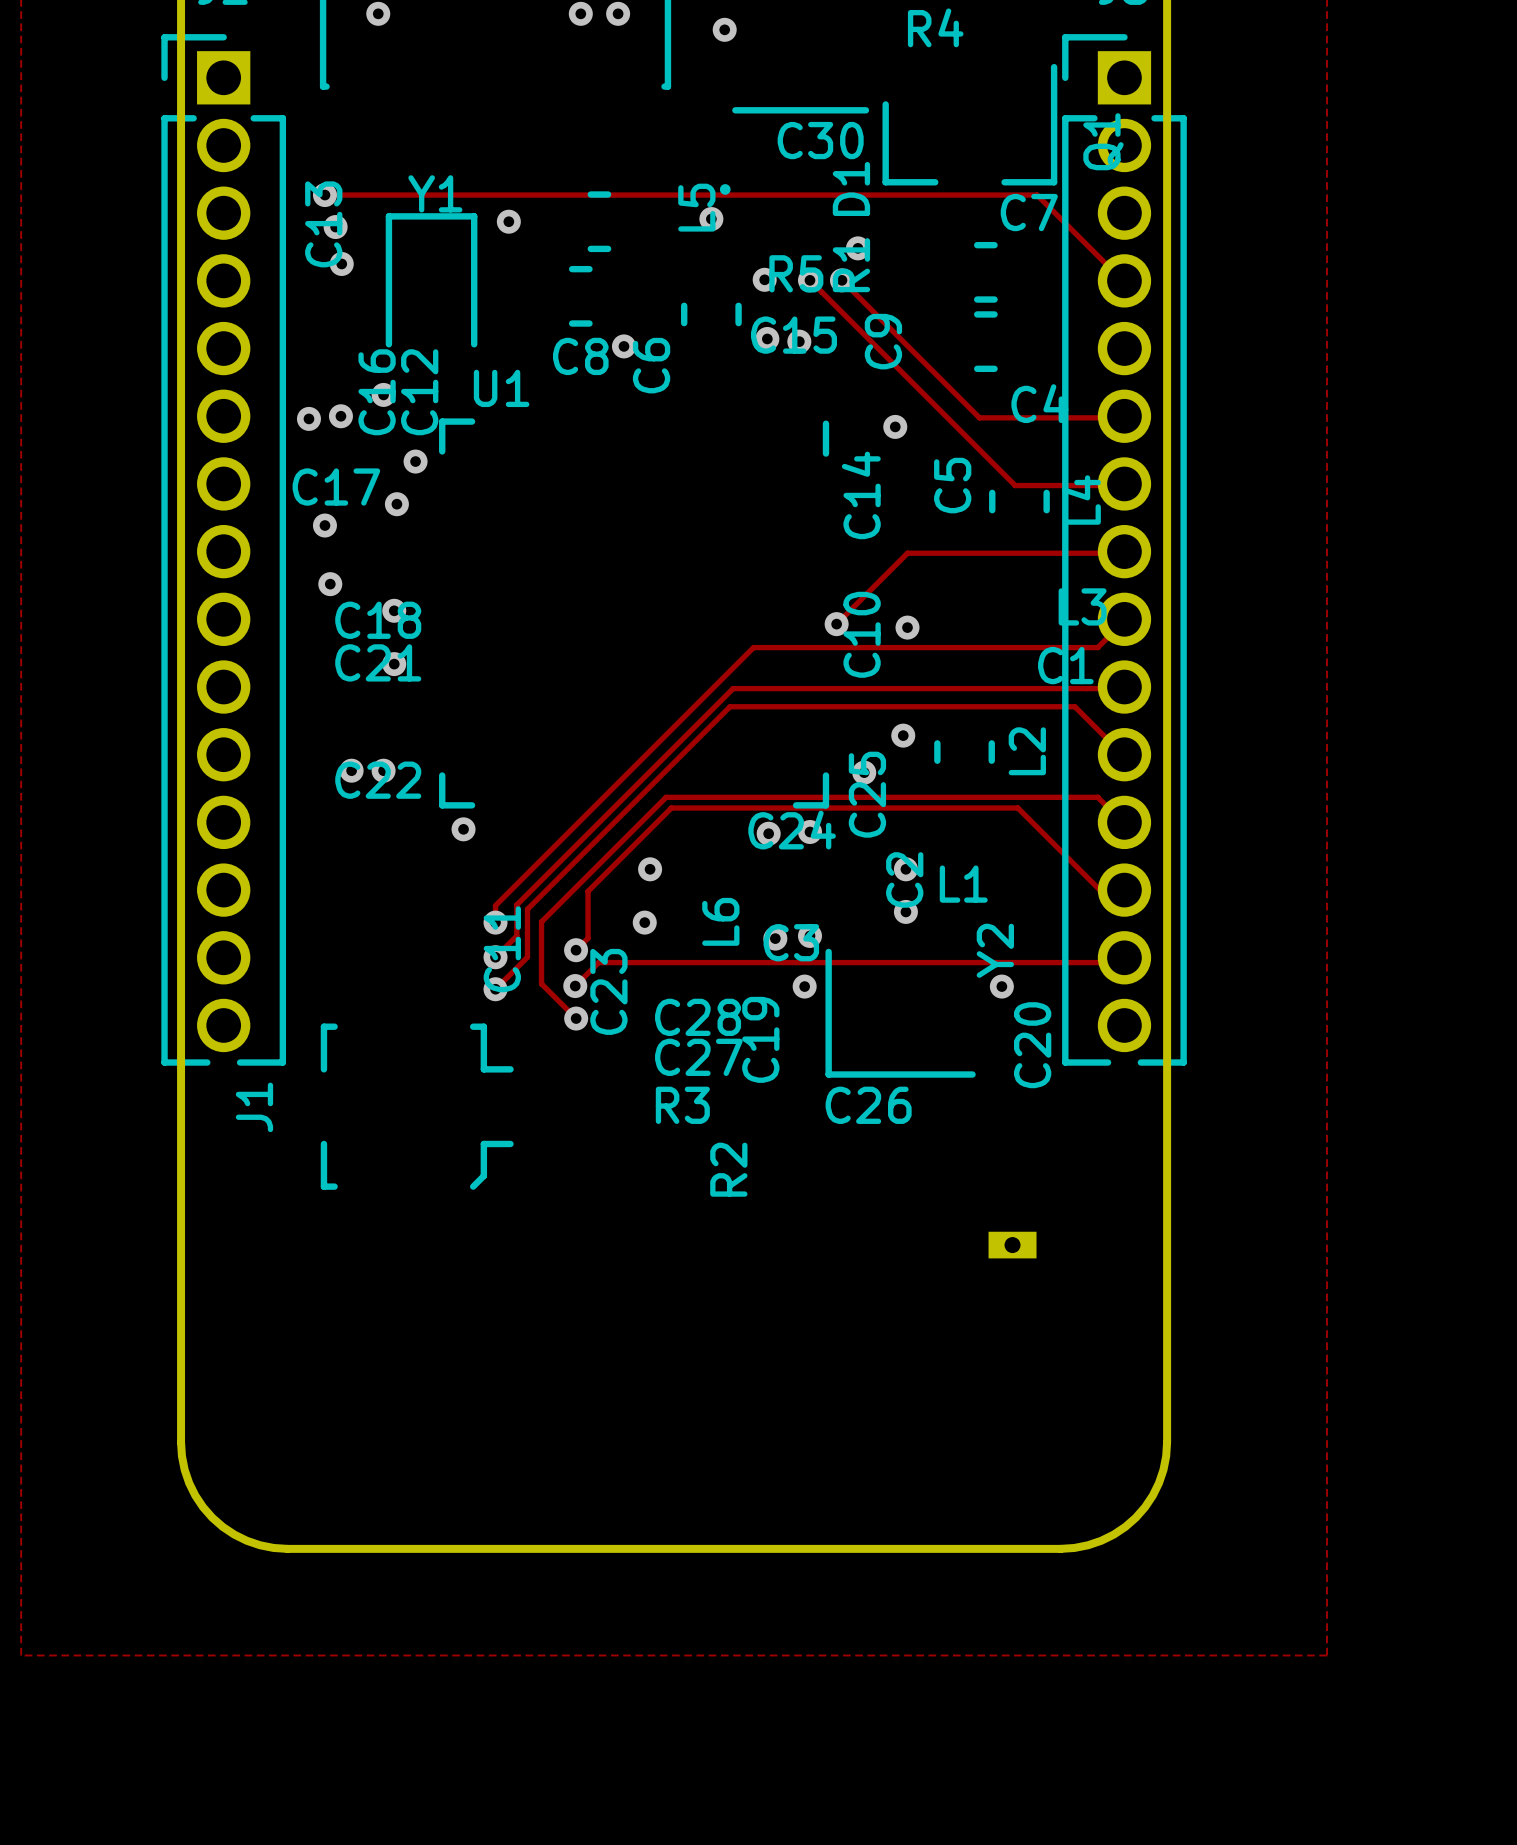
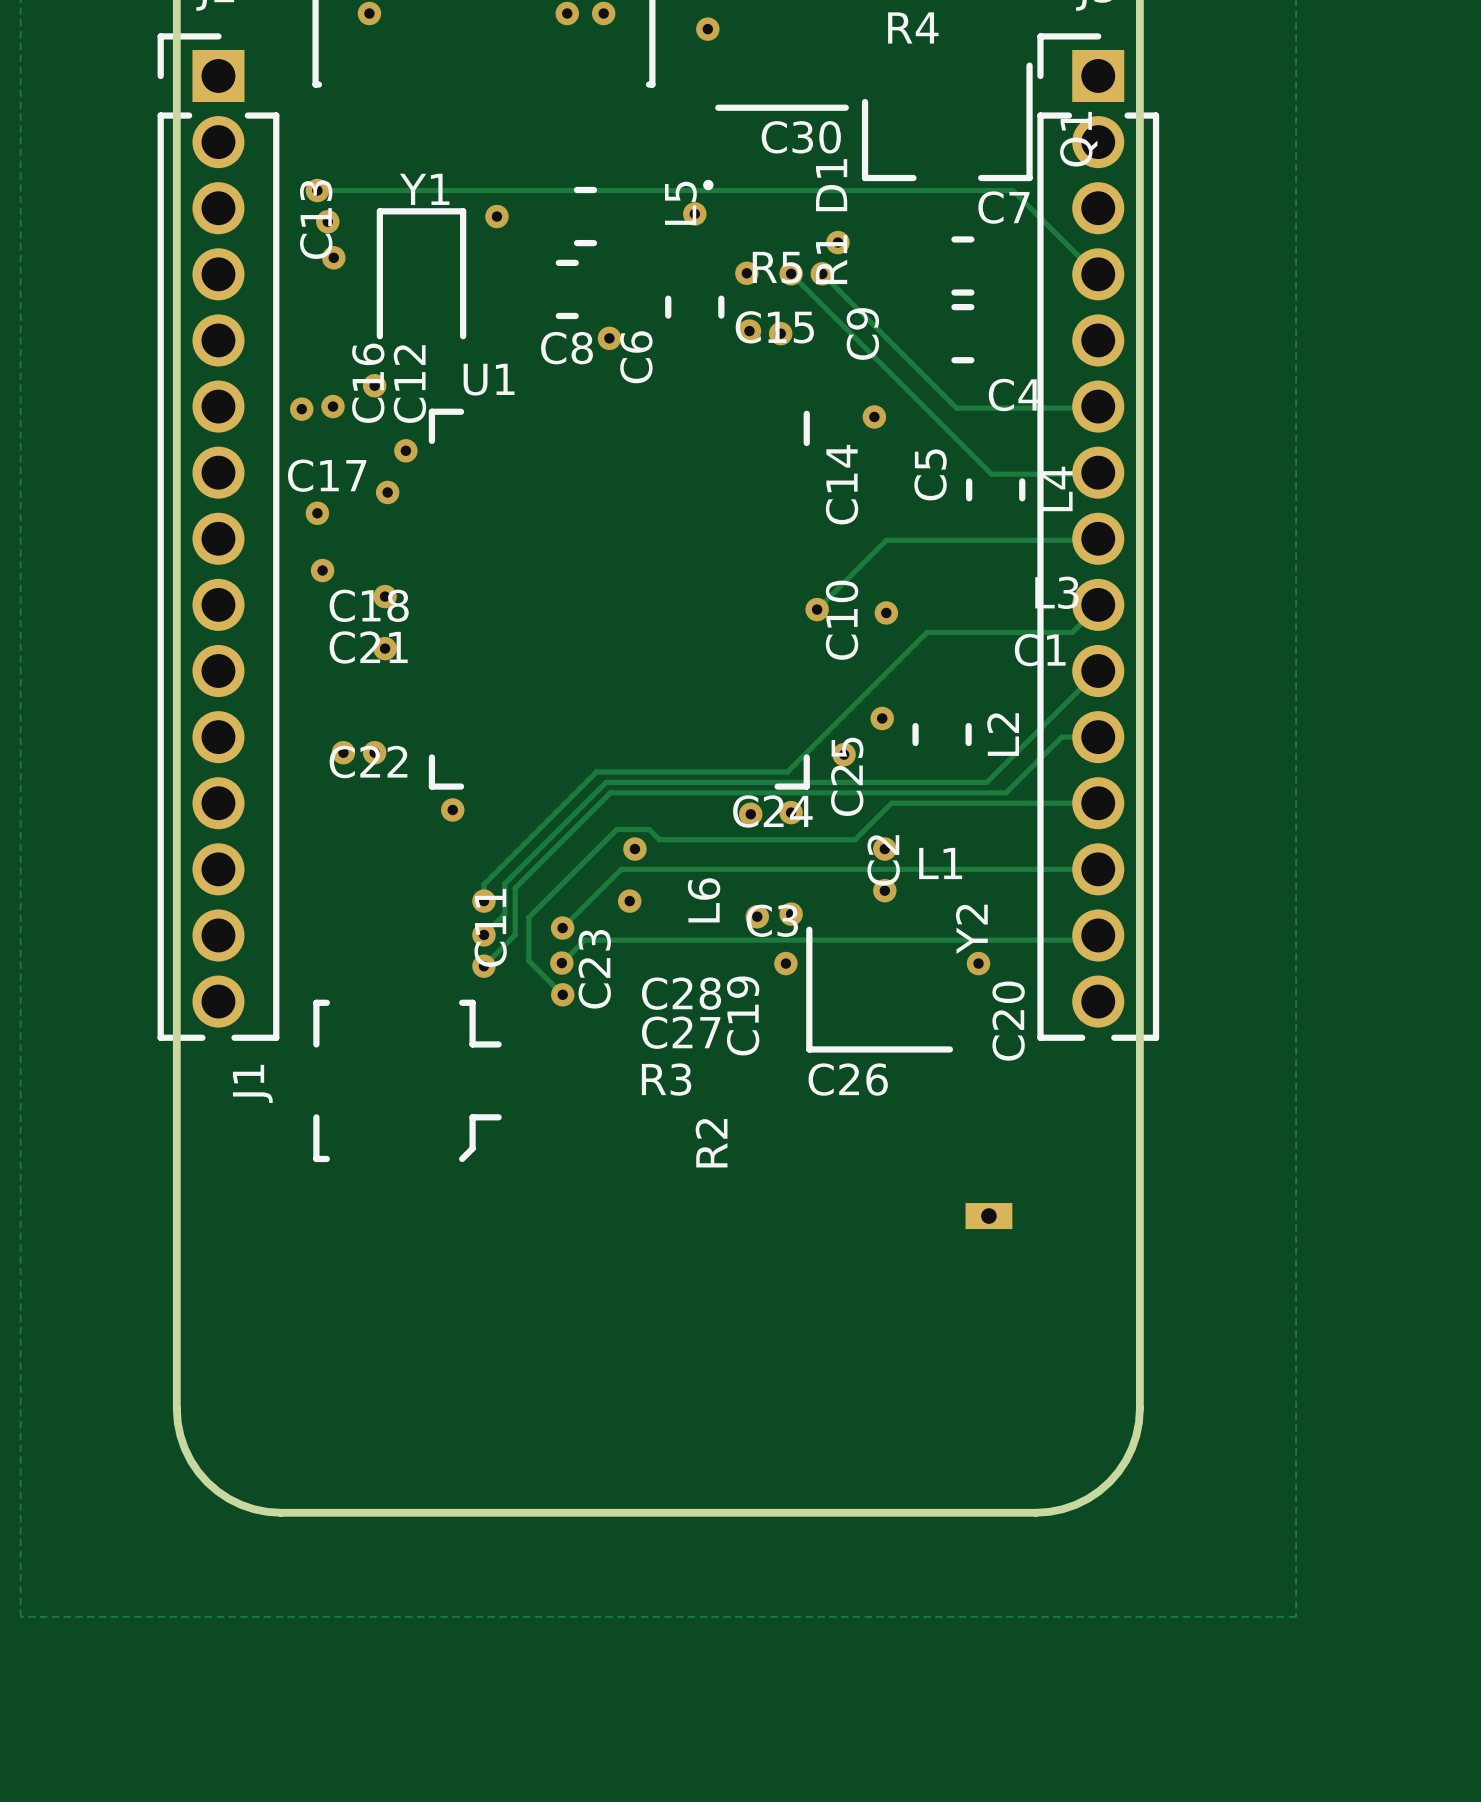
track: (949, 647) (753, 647) (610, 790) -> (926, 632) (787, 771) (596, 771)
track: (1124, 688) (733, 688) (620, 801) -> (1098, 671) (986, 782) (606, 782)
track: (1124, 756) (1074, 706) (730, 706) (625, 811) -> (1098, 737) (1061, 737) (1006, 792) (610, 792)
track: (1124, 824) (1097, 797) (666, 797) (541, 921) (541, 939) -> (1098, 803) (891, 803) (855, 839) (659, 839) (649, 829) (616, 829) (528, 917)
track: (1124, 891) (1101, 891) (1017, 808) (671, 808) (588, 891) (588, 938) -> (1098, 869) (621, 869) (574, 916)

